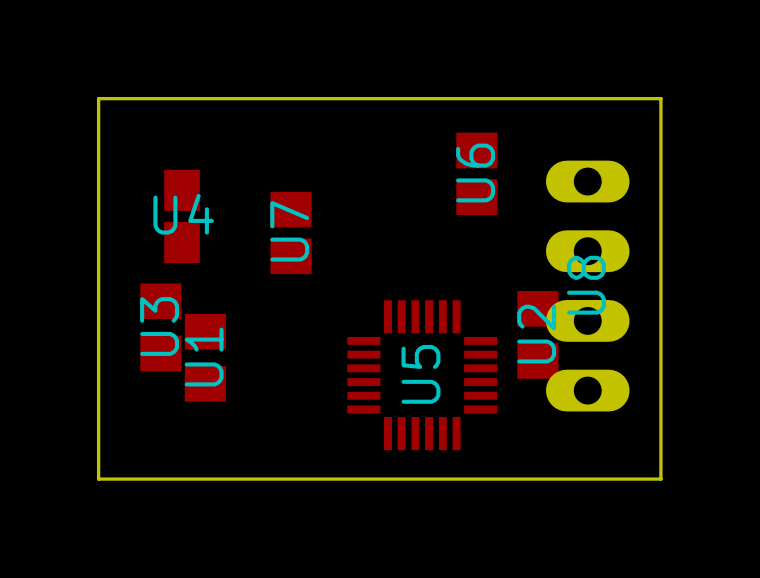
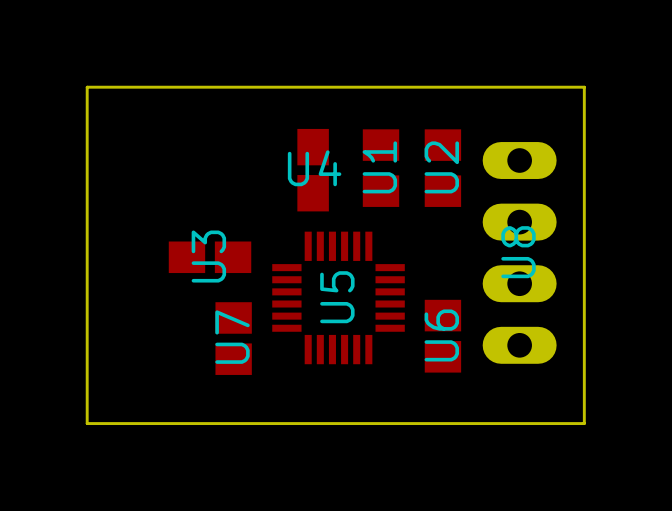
U6 position: (476, 173) -> (442, 336)
U4 position: (182, 216) -> (313, 170)
U7 position: (291, 232) -> (233, 338)
U3 footprint: [140, 283, 182, 372] -> [168, 241, 252, 274]
U2 position: (537, 334) -> (442, 168)
U1 position: (205, 357) -> (381, 168)
U5 position: (422, 375) -> (338, 297)

